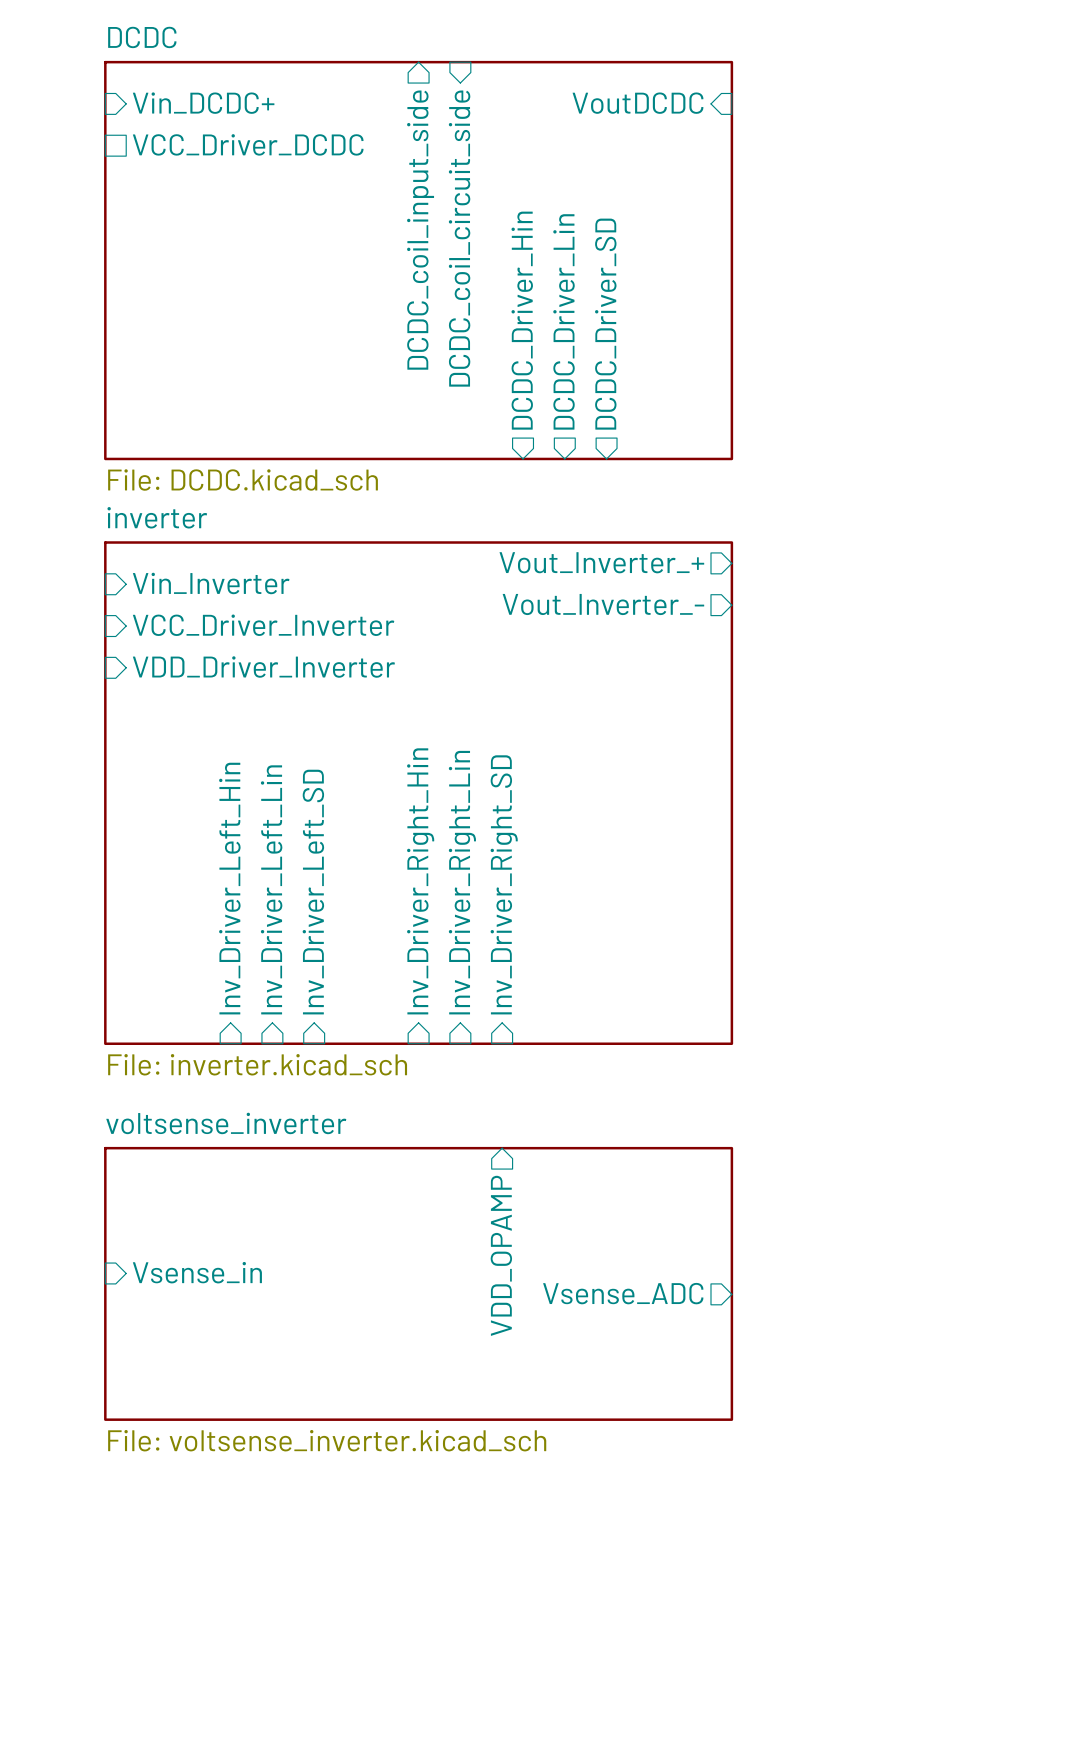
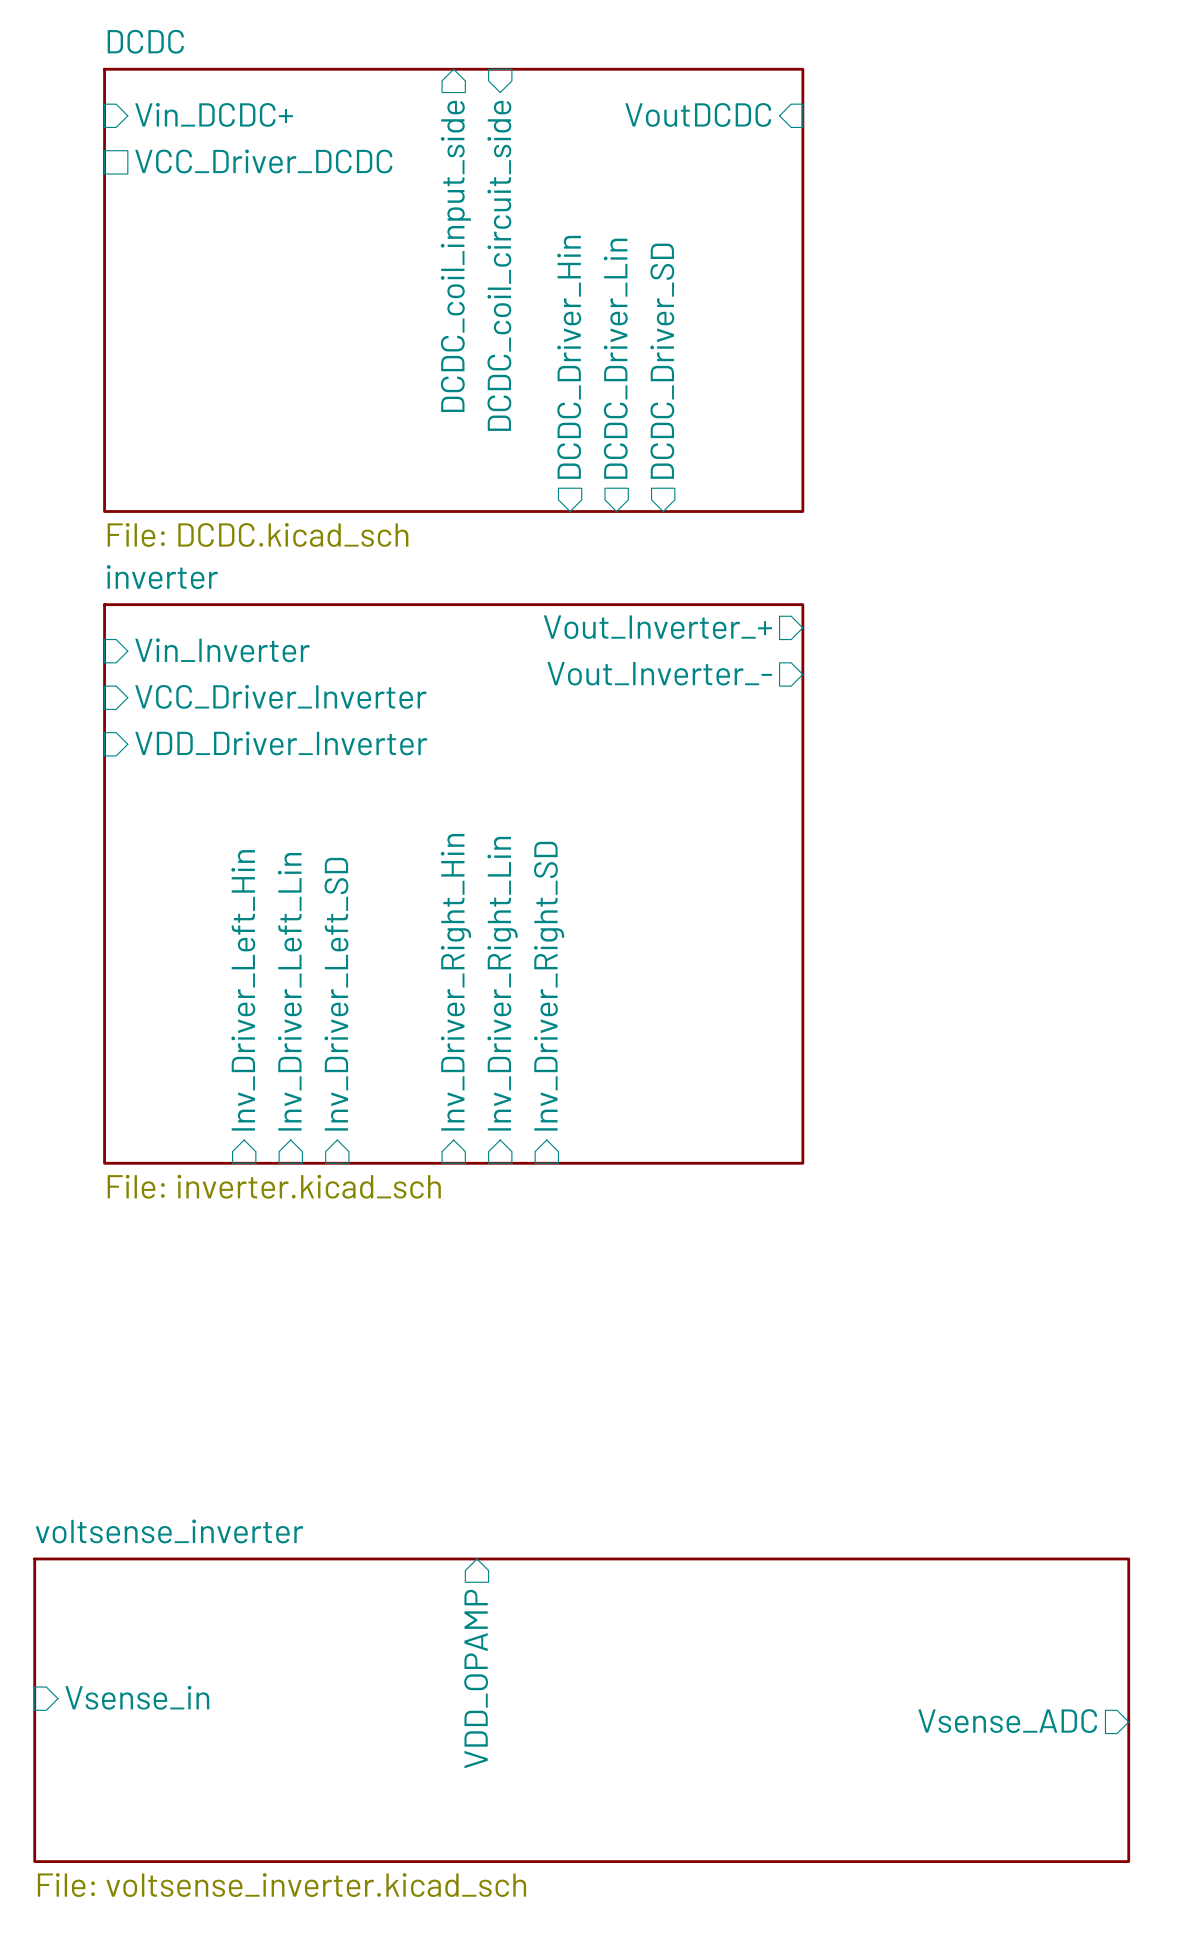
sheet pin position: VDD_OPAMP (501, 1255) -> VDD_OPAMP (476, 1678)
sheet pin position: Vsense_in (197, 1272) -> Vsense_in (137, 1697)
sheet voltsense_inverter: File: voltsense_inverter.kicad_sch (418, 1283) -> none
sheet pin position: Vsense_ADC (623, 1293) -> Vsense_ADC (1007, 1721)
sheet voltsense_inverter: none -> File: voltsense_inverter.kicad_sch (581, 1710)

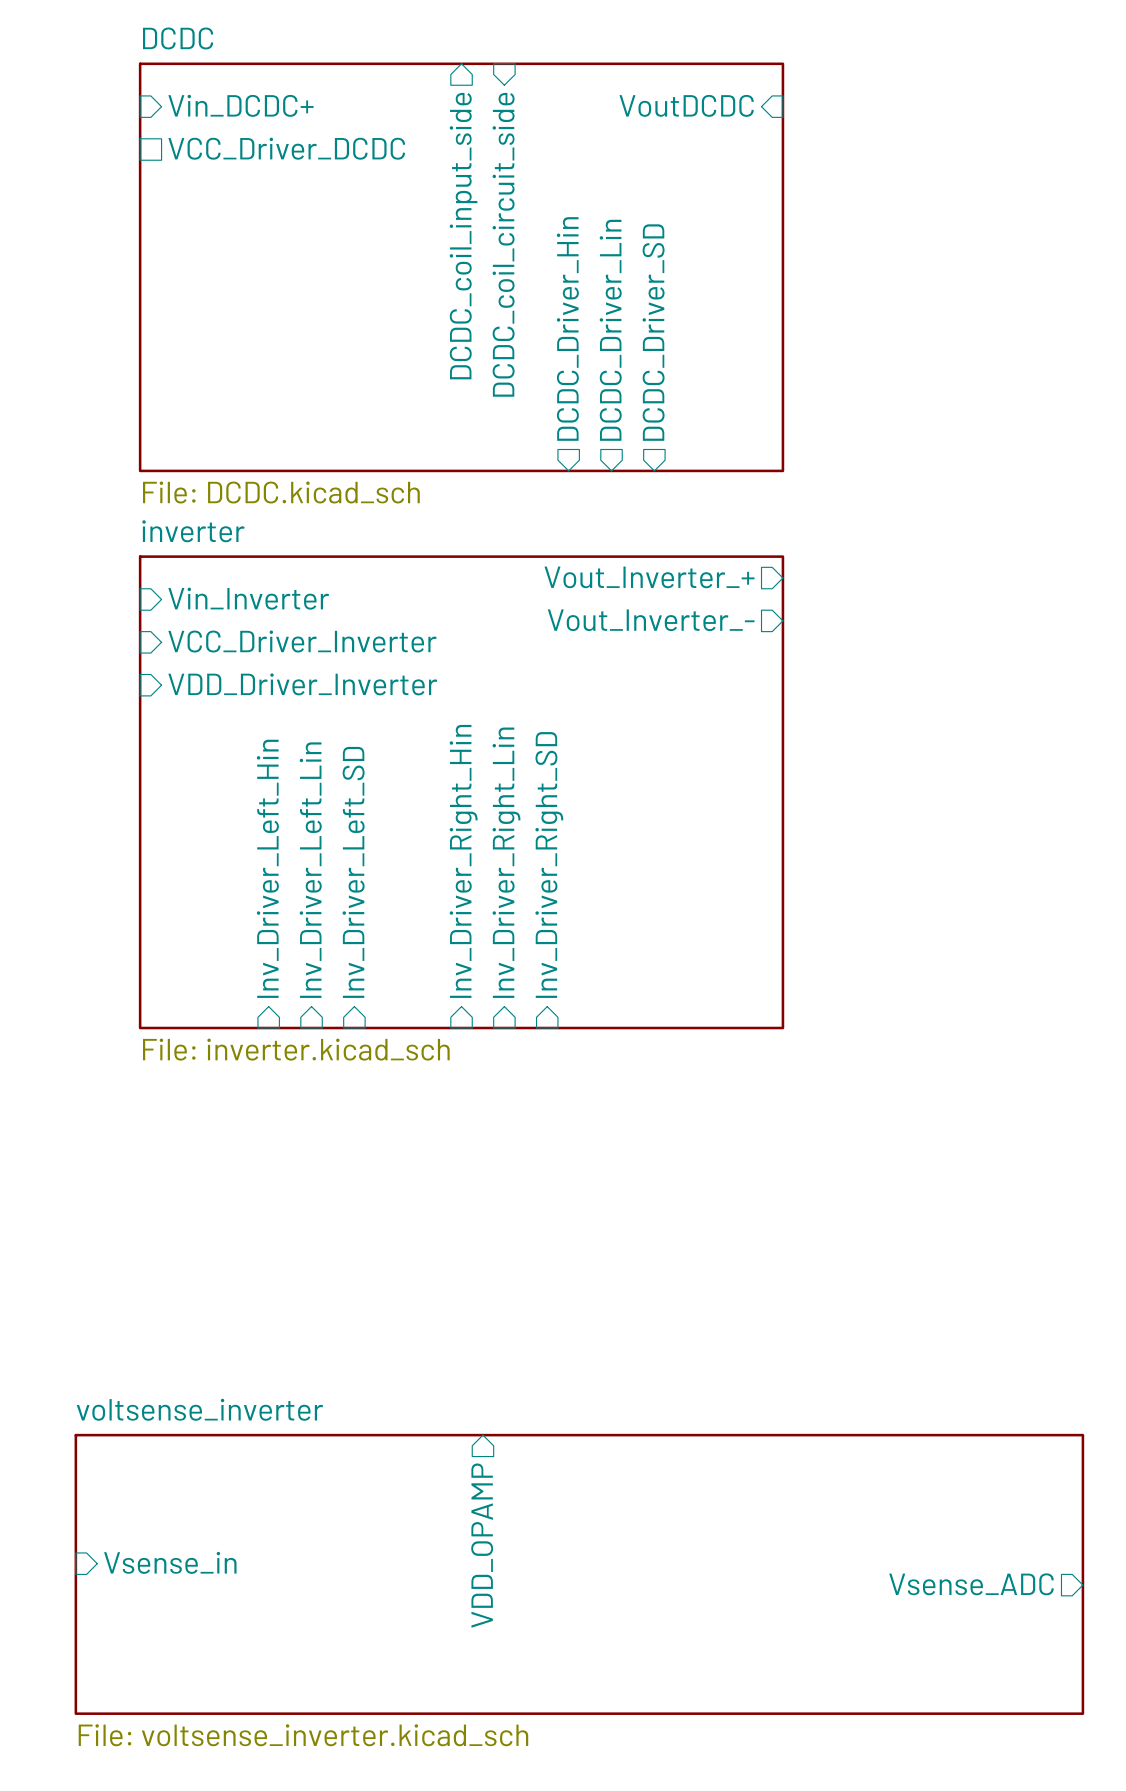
sheet inverter: none -> File: inverter.kicad_sch (461, 792)
sheet inverter: File: inverter.kicad_sch (453, 883) -> none
sheet pin position: Inv_Driver_Right_Hin (455, 982) -> Inv_Driver_Right_Hin (463, 861)
sheet pin position: Inv_Driver_Right_Lin (502, 983) -> Inv_Driver_Right_Lin (506, 862)
sheet pin position: Inv_Driver_Right_SD (549, 986) -> Inv_Driver_Right_SD (549, 865)
sheet pin position: Inv_Driver_Left_Hin (243, 990) -> Inv_Driver_Left_Hin (267, 868)
sheet pin position: Inv_Driver_Left_Lin (289, 991) -> Inv_Driver_Left_Lin (310, 870)
sheet pin position: Inv_Driver_Left_SD (336, 994) -> Inv_Driver_Left_SD (353, 872)

